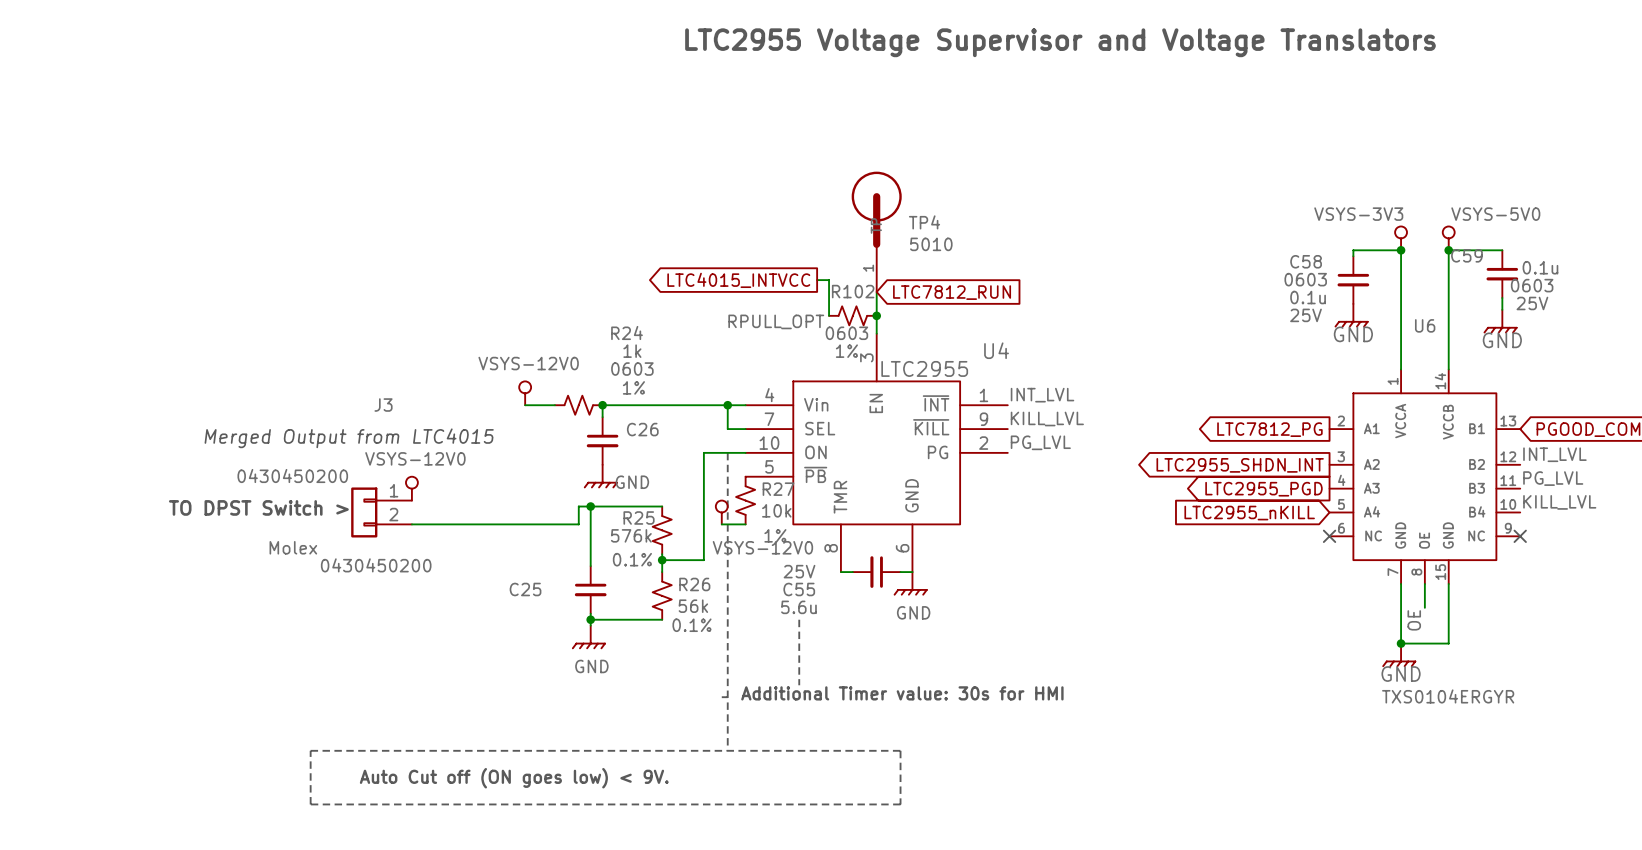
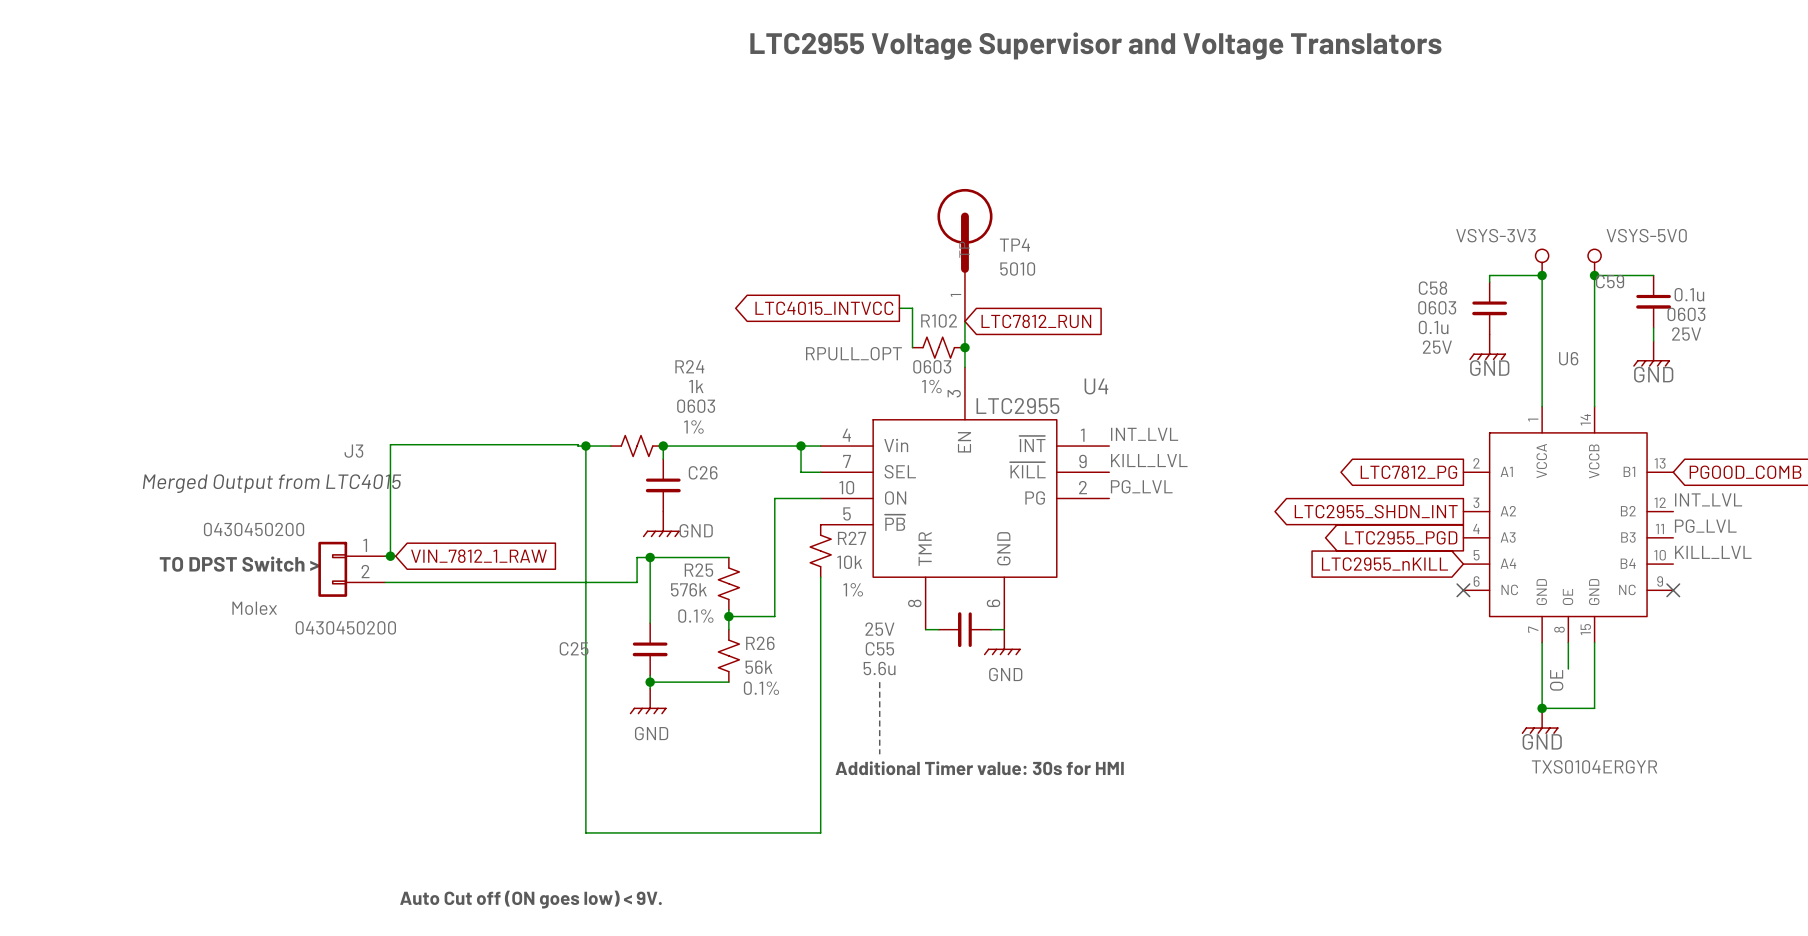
power symbol: VSYS-12V0 (525, 393) -> none
wire: none -> (578, 446) (390, 444) (390, 556)
junction: none -> (585, 446)
text position: Merged Output from LTC4015 (349, 438) -> Merged Output from LTC4015 (271, 483)
line: (727, 452) (727, 750) -> none
power symbol: VSYS-12V0 (411, 488) -> none
junction: none -> (390, 556)
global label: none -> VIN_7812_1_RAW (478, 556)
text position: TO DPST Switch > (258, 507) -> TO DPST Switch > (239, 564)
J3 position: (381, 512) -> (351, 569)
power symbol: VSYS-12V0 (721, 512) -> none
wire: (411, 524) (578, 524) -> (385, 582) (637, 582) (637, 577)
wire: (721, 524) (745, 524) -> (585, 446) (585, 832) (820, 832) (820, 577)
text position: Additional Timer value: 30s for HMI (902, 693) -> Additional Timer value: 30s for HMI (979, 768)
line: (721, 697) (727, 697) -> none
line: (310, 750) (900, 750) (900, 804) (310, 804) (310, 750) -> none
text position: Auto Cut off (ON goes low) < 9V. (514, 778) -> Auto Cut off (ON goes low) < 9V. (530, 899)

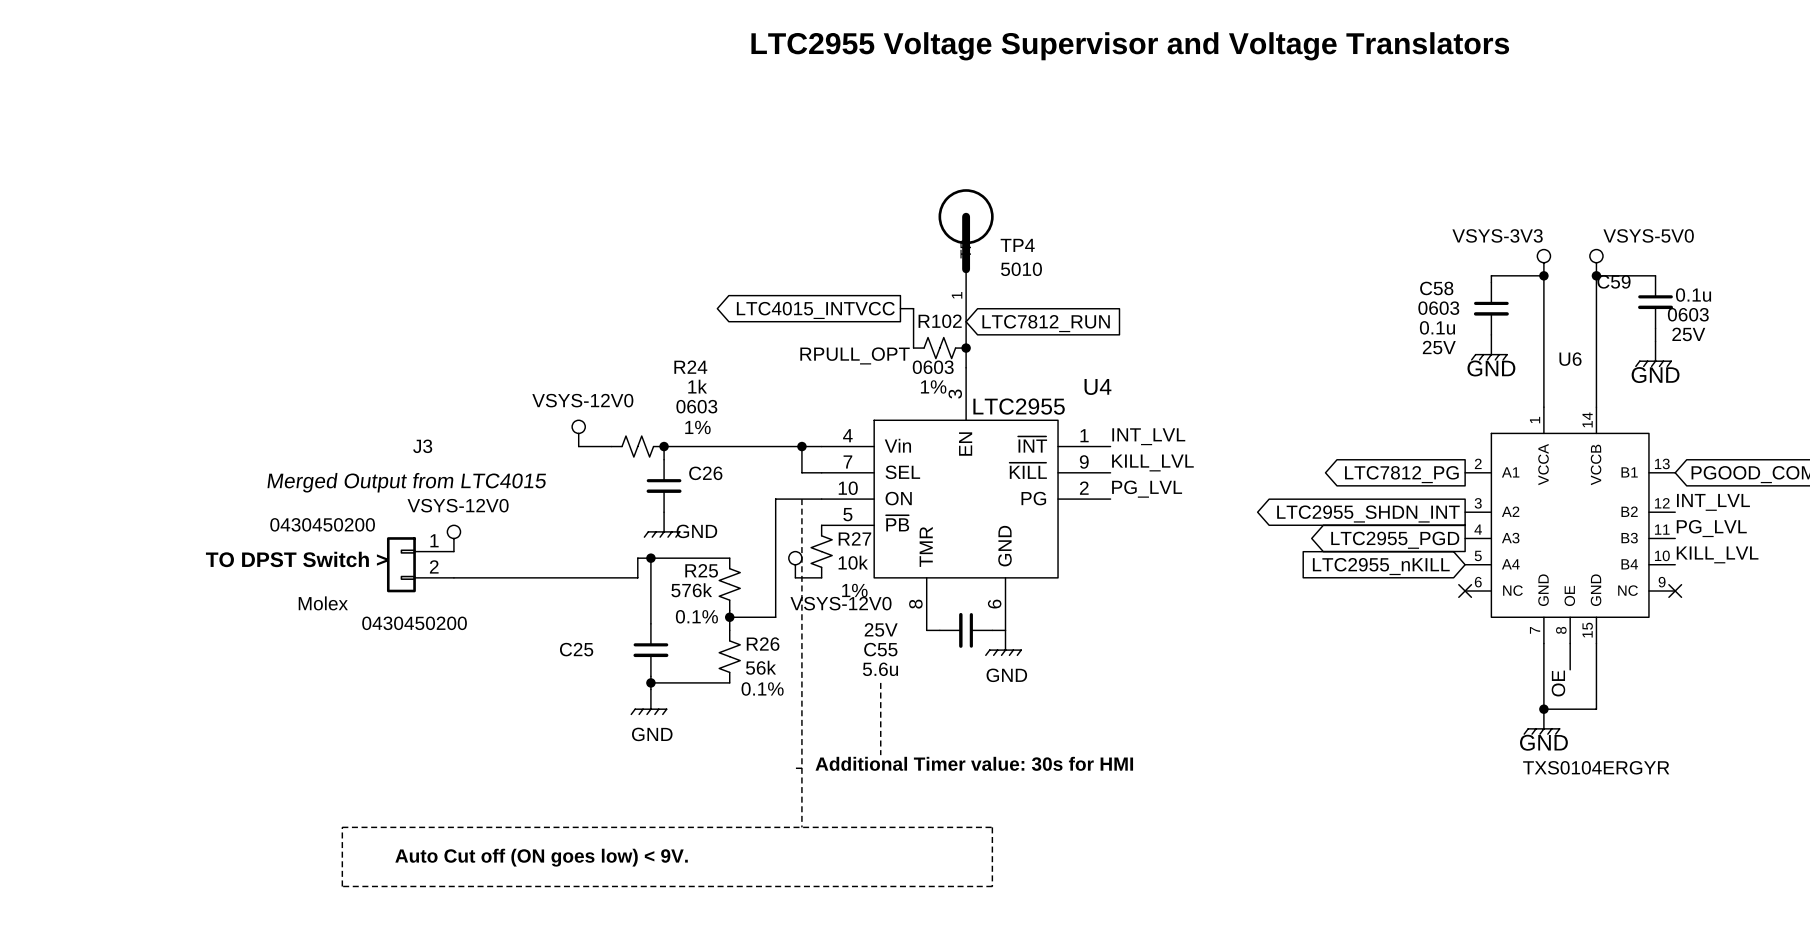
power symbol: none -> VSYS-12V0 (578, 433)
wire: (578, 446) (390, 444) (390, 556) -> none
wire: (585, 446) (585, 832) (820, 832) (820, 577) -> (795, 577) (821, 577)
junction: (585, 446) -> none
text position: Merged Output from LTC4015 (271, 483) -> Merged Output from LTC4015 (406, 482)
line: none -> (801, 499) (801, 827)
power symbol: none -> VSYS-12V0 (453, 538)
junction: (390, 556) -> none
global label: VIN_7812_1_RAW (478, 556) -> none
text position: TO DPST Switch > (239, 564) -> TO DPST Switch > (296, 559)
power symbol: none -> VSYS-12V0 (795, 564)
J3 position: (351, 569) -> (420, 564)
wire: (637, 577) (637, 582) (385, 582) -> (637, 577) (453, 577)
line: none -> (795, 768) (801, 768)
text position: Additional Timer value: 30s for HMI (979, 768) -> Additional Timer value: 30s for HMI (974, 763)
line: none -> (342, 827) (992, 827) (992, 886) (342, 886) (342, 827)
text position: Auto Cut off (ON goes low) < 9V. (530, 899) -> Auto Cut off (ON goes low) < 9V. (541, 857)

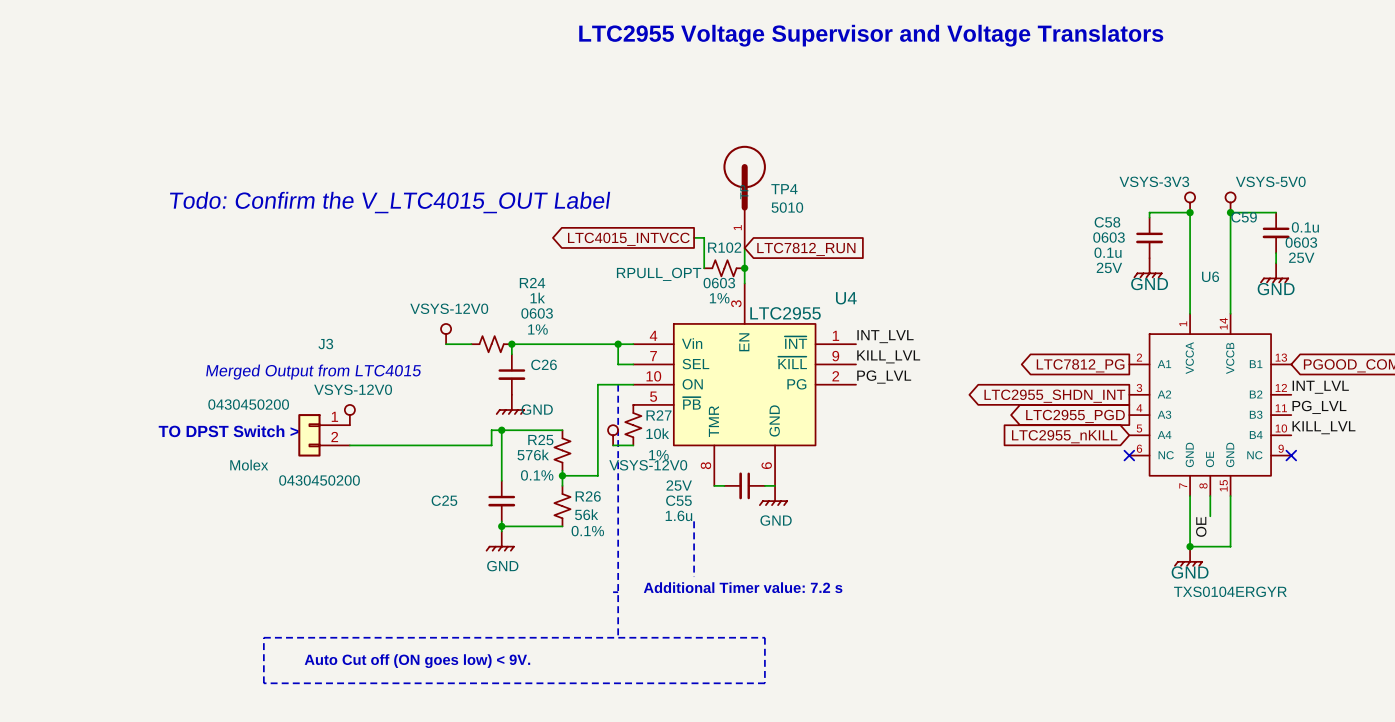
text: none -> Todo: Confirm the V_LTC4015_OUT Label (390, 202)
C55 value: 5.6u (880, 669) -> 1.6u (678, 515)
line: (880, 682) (880, 755) -> (694, 521) (694, 577)
text: Additional Timer value: 30s for HMI (974, 763) -> Additional Timer value: 7.2 s (743, 587)

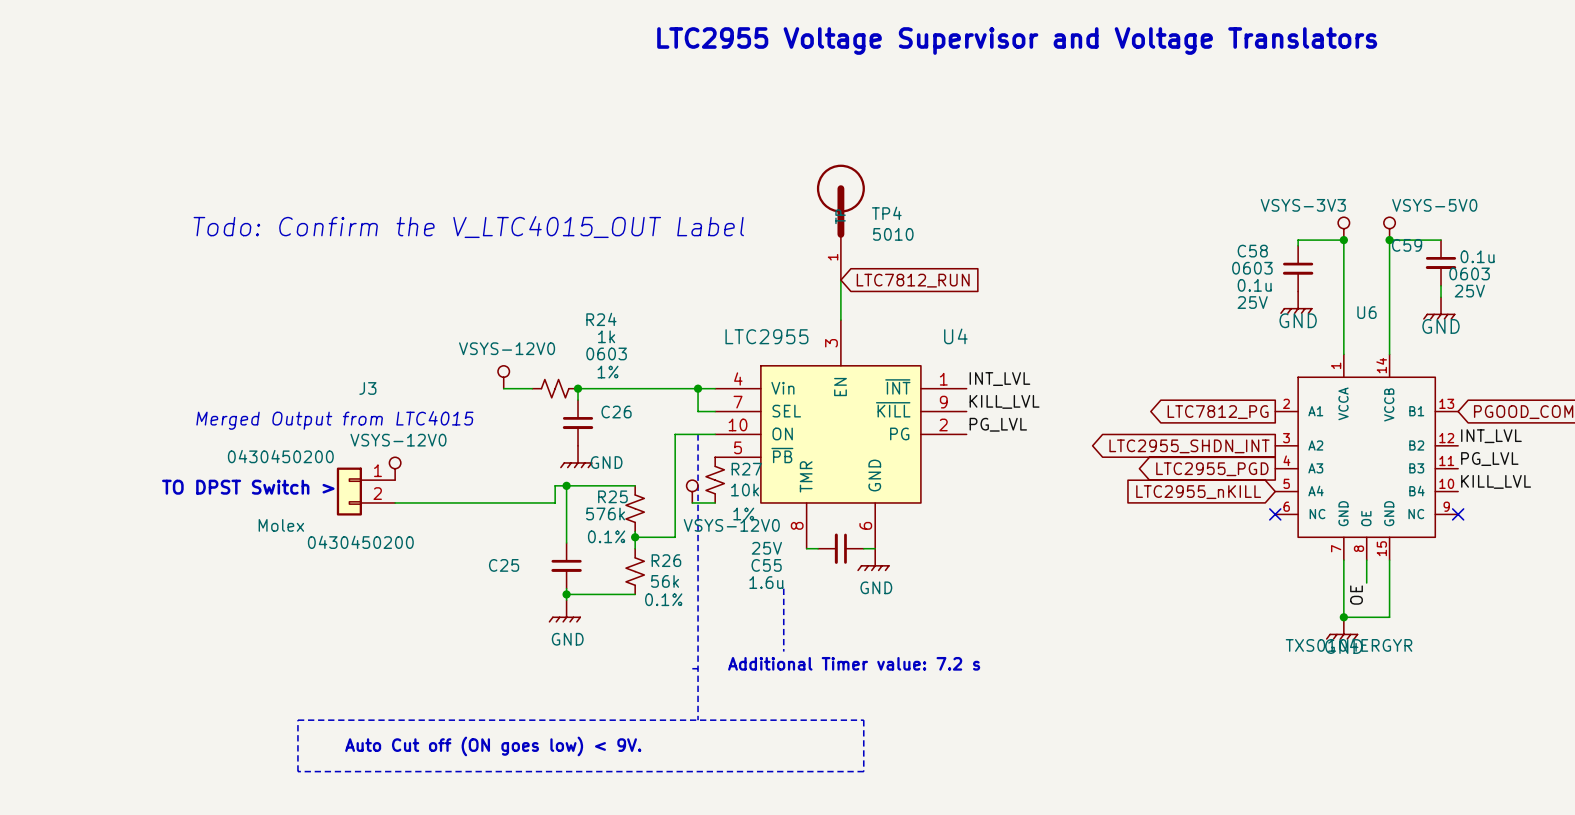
wire: (694, 237) (704, 237) (704, 268) -> none
global label: LTC4015_INTVCC (628, 239) -> none
R102: RPULL_OPT (724, 268) -> none
junction: (744, 268) -> none
U4 value position: LTC2955 (785, 313) -> LTC2955 (766, 336)
U6 value position: TXS0104ERGYR (1230, 591) -> TXS0104ERGYR (1349, 645)

